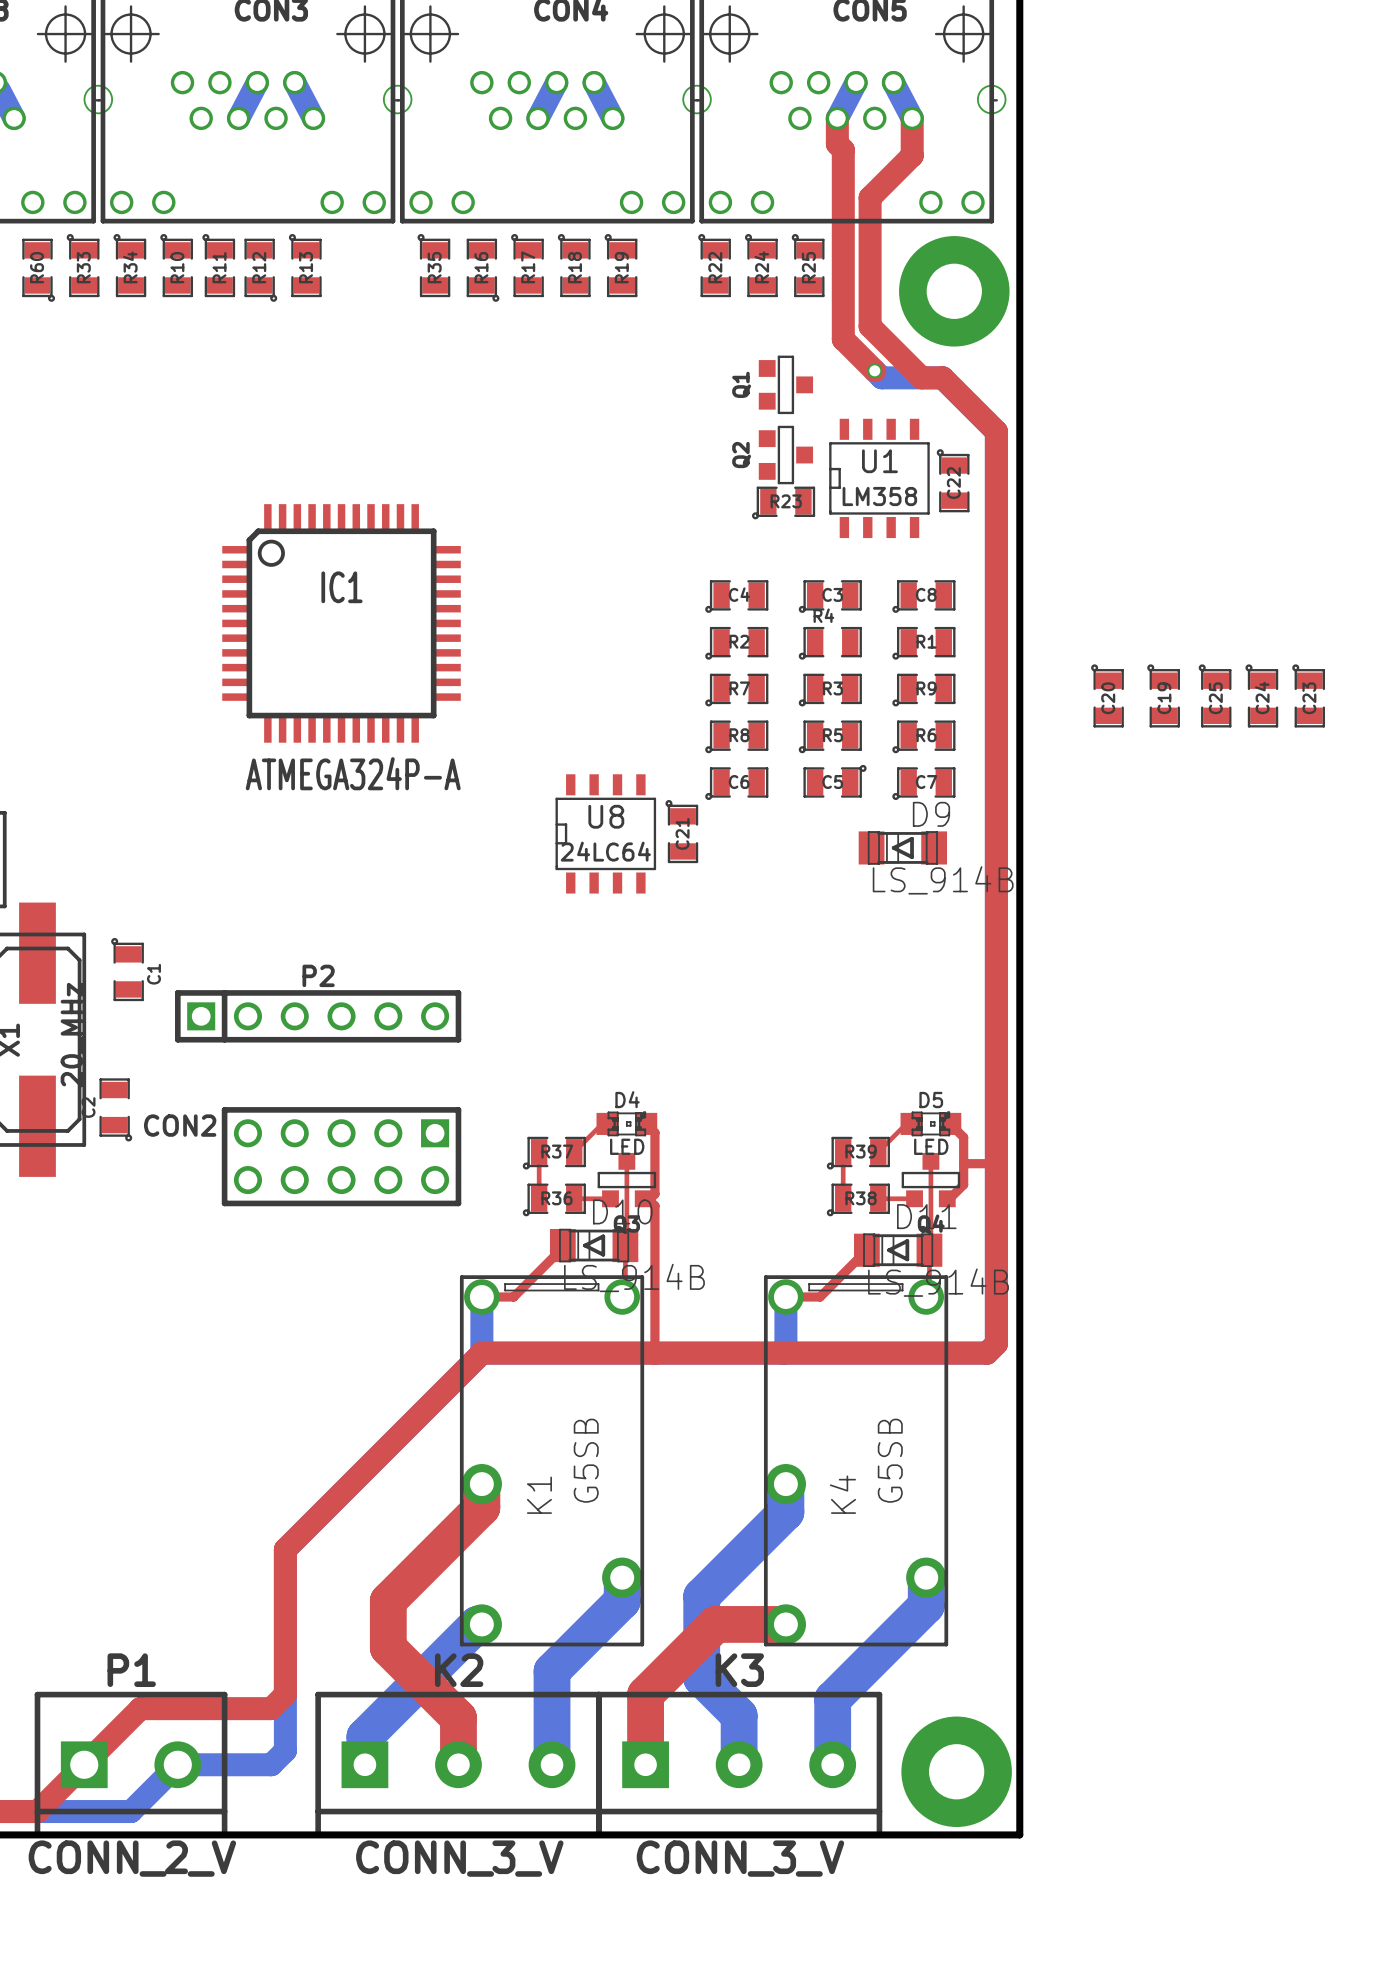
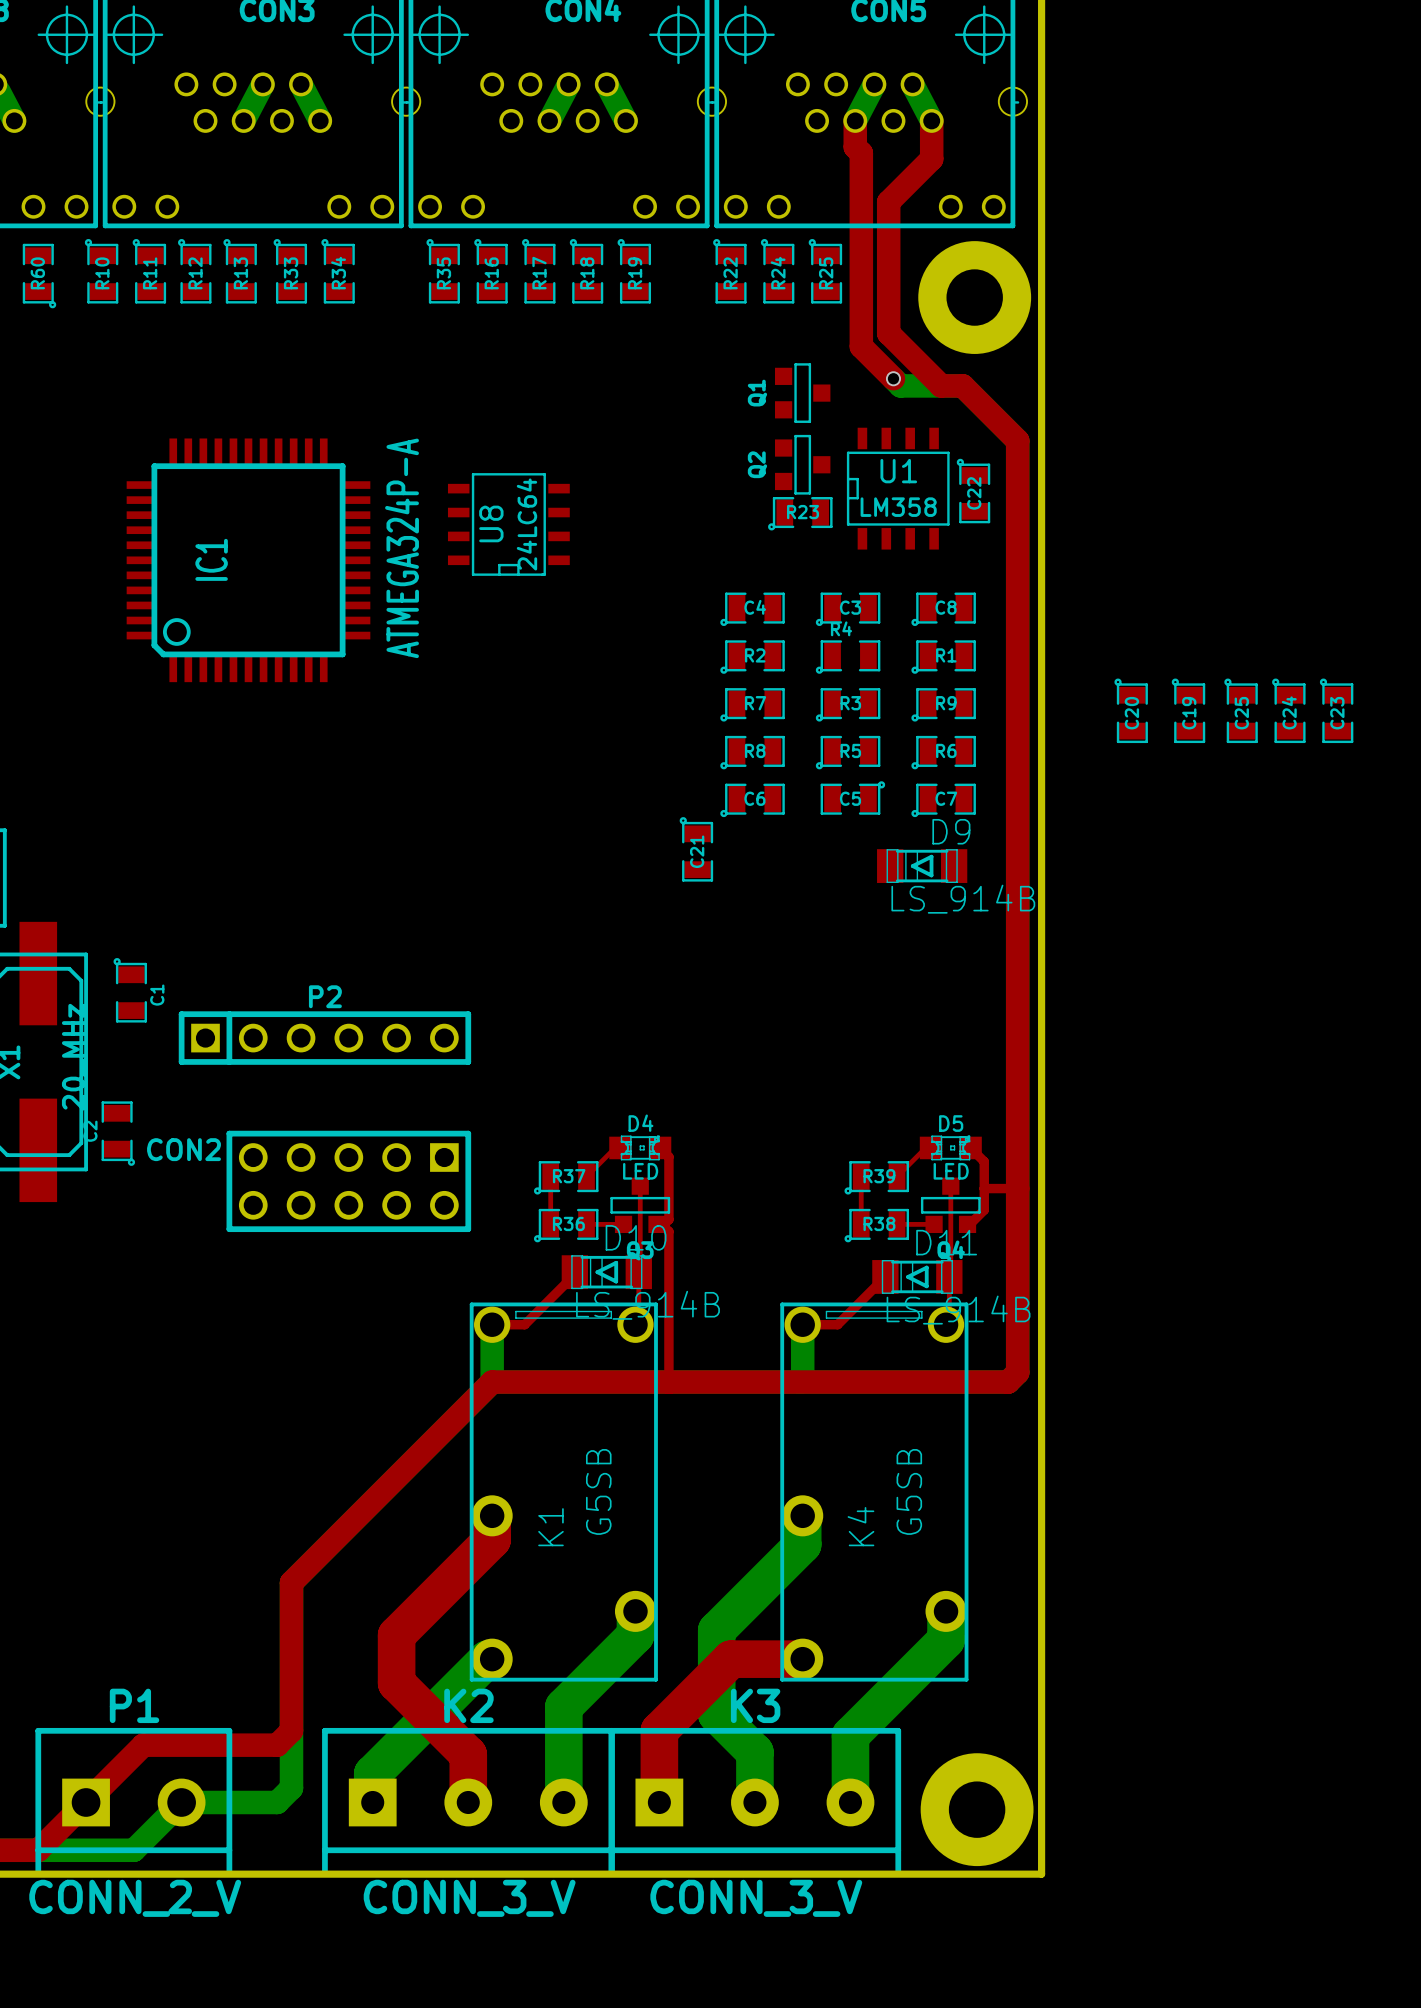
R33 position: (83, 265) -> (290, 271)
R34 position: (129, 265) -> (338, 271)
R10 position: (176, 265) -> (101, 271)
R11 position: (218, 265) -> (149, 271)
R13 position: (305, 265) -> (240, 271)
R12 rotation: 0° (260, 270) -> 180° (194, 271)
R12 position: (260, 270) -> (194, 271)
R16 rotation: 0° (483, 270) -> 180° (490, 271)
IC1 rotation: 0° (341, 623) -> 90° counterclockwise (248, 560)
U8 rotation: 0° (605, 833) -> 90° counterclockwise (508, 524)
U8 position: (605, 833) -> (508, 524)

